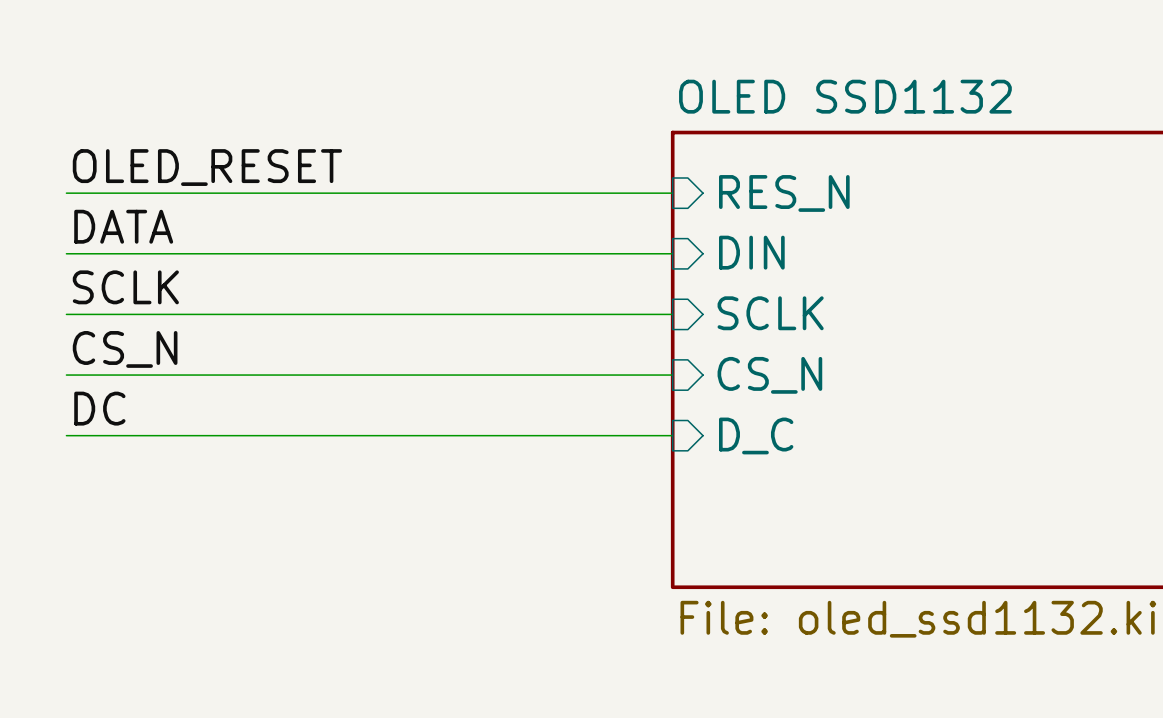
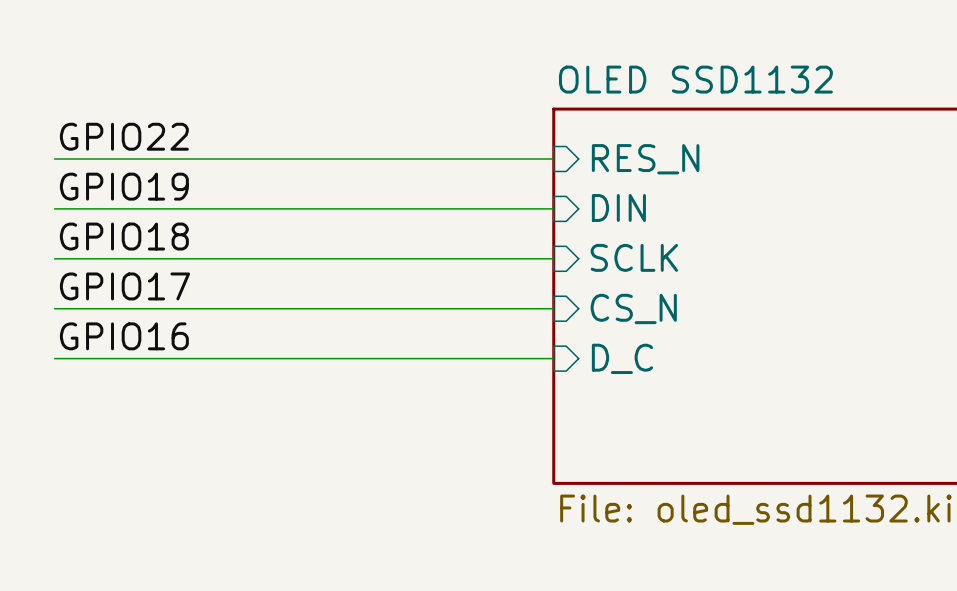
label: OLED_RESET (207, 167) -> GPIO22 (124, 136)
label: DATA (123, 226) -> GPIO19 (124, 186)
label: SCLK (125, 287) -> GPIO18 (124, 236)
label: CS_N (125, 349) -> GPIO17 (124, 286)
label: DC (99, 408) -> GPIO16 (124, 336)

